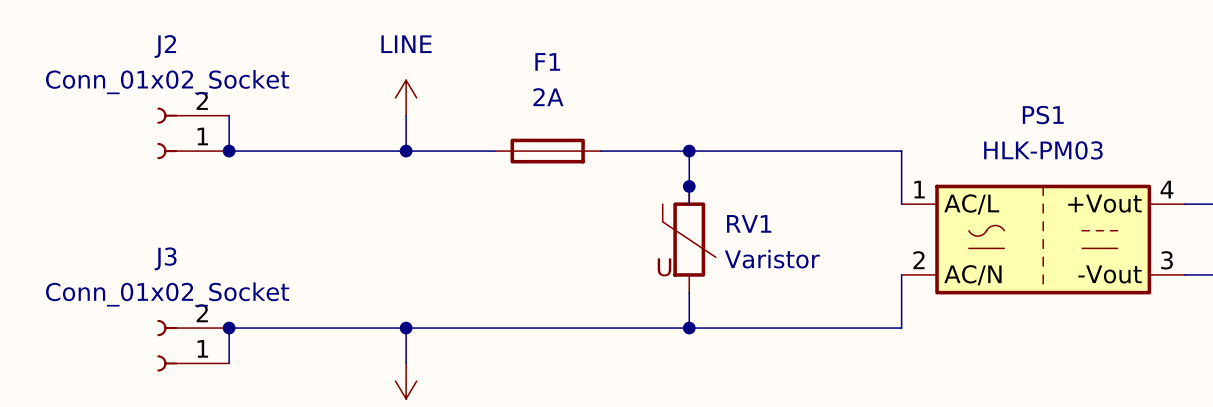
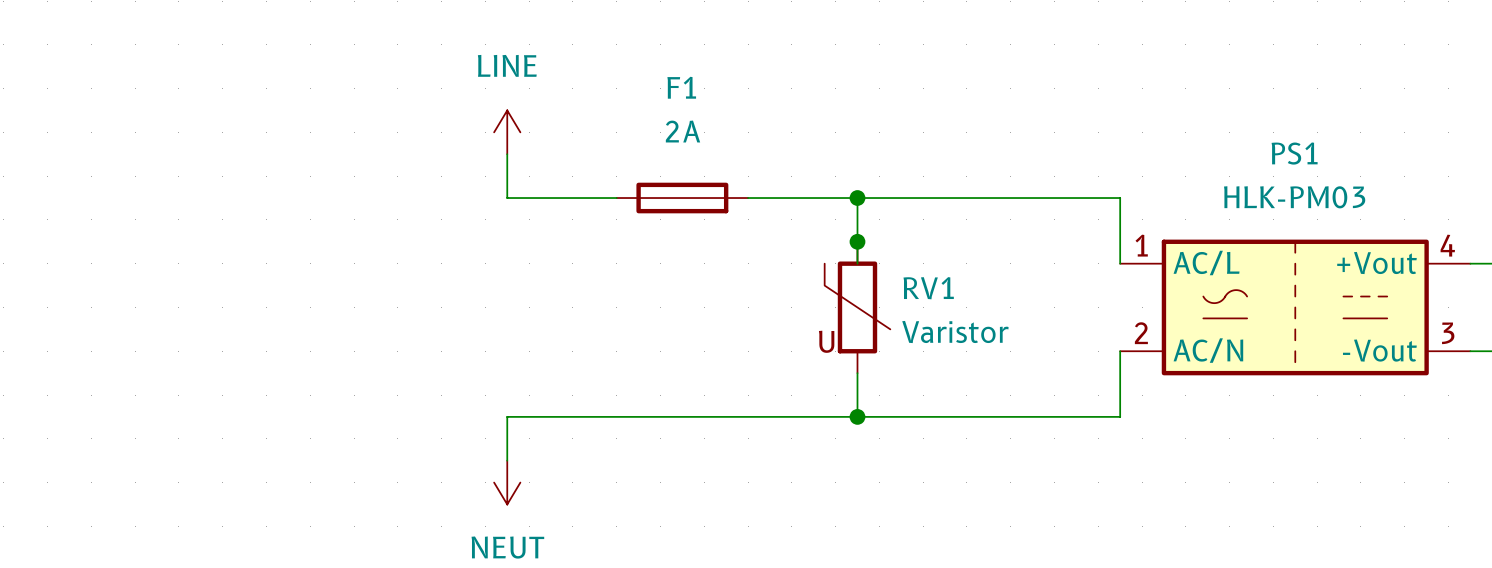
wire: (229, 115) (229, 151) (406, 151) -> none
J2: Conn_01x02_Socket (193, 133) -> none
junction: (229, 151) -> none
junction: (406, 151) -> none
junction: (229, 328) -> none
wire: (406, 328) (229, 328) (229, 363) -> none
junction: (406, 328) -> none
J3: Conn_01x02_Socket (193, 345) -> none

